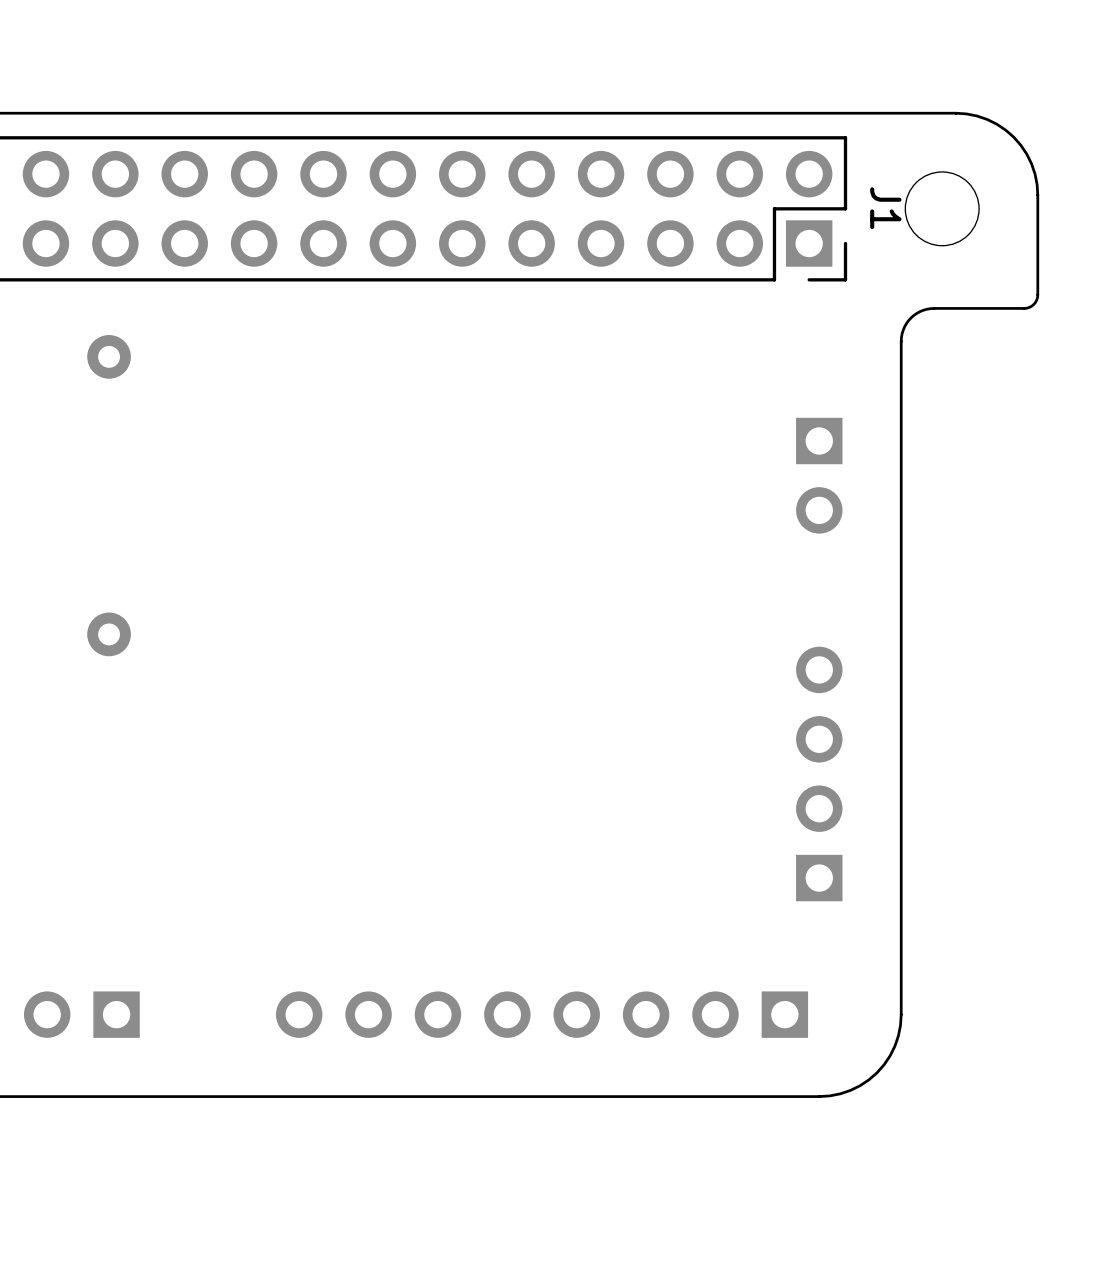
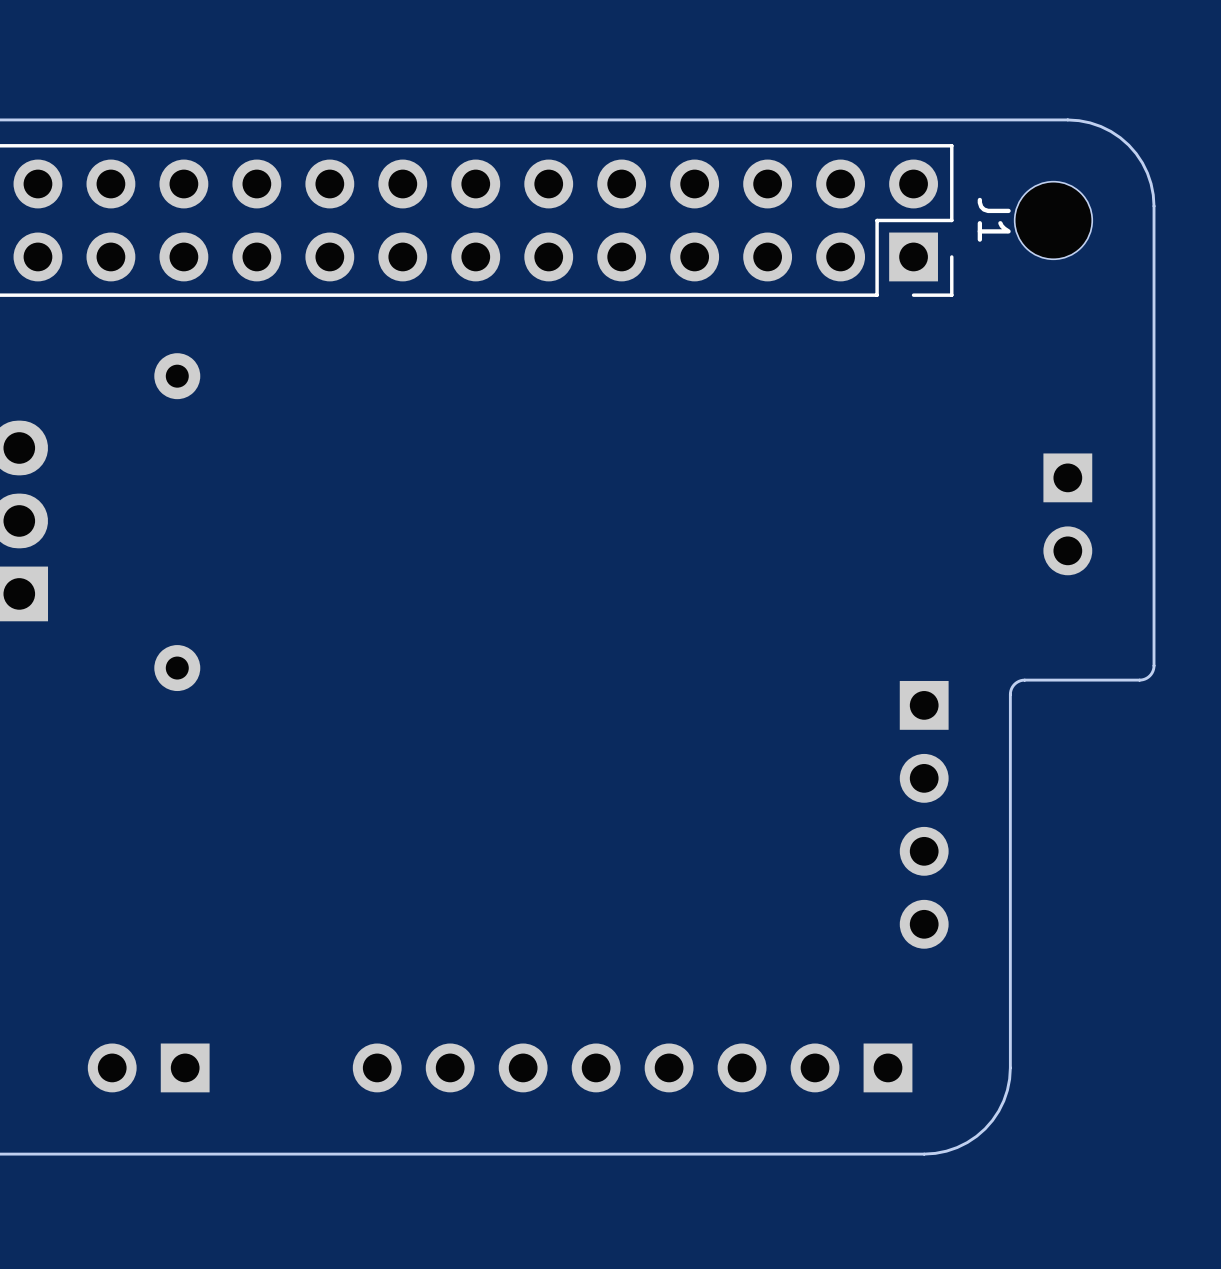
board edge: (1037, 294) (1034, 303) (1025, 308) (926, 309) (913, 315) (903, 330) (901, 341) (901, 659) -> (1154, 310) (1152, 671) (1148, 677) (1141, 679) (1022, 680) (1013, 685) (1010, 694)
part position: (819, 475) -> (1067, 514)
part rotation: 0° (819, 773) -> 180° (924, 814)

